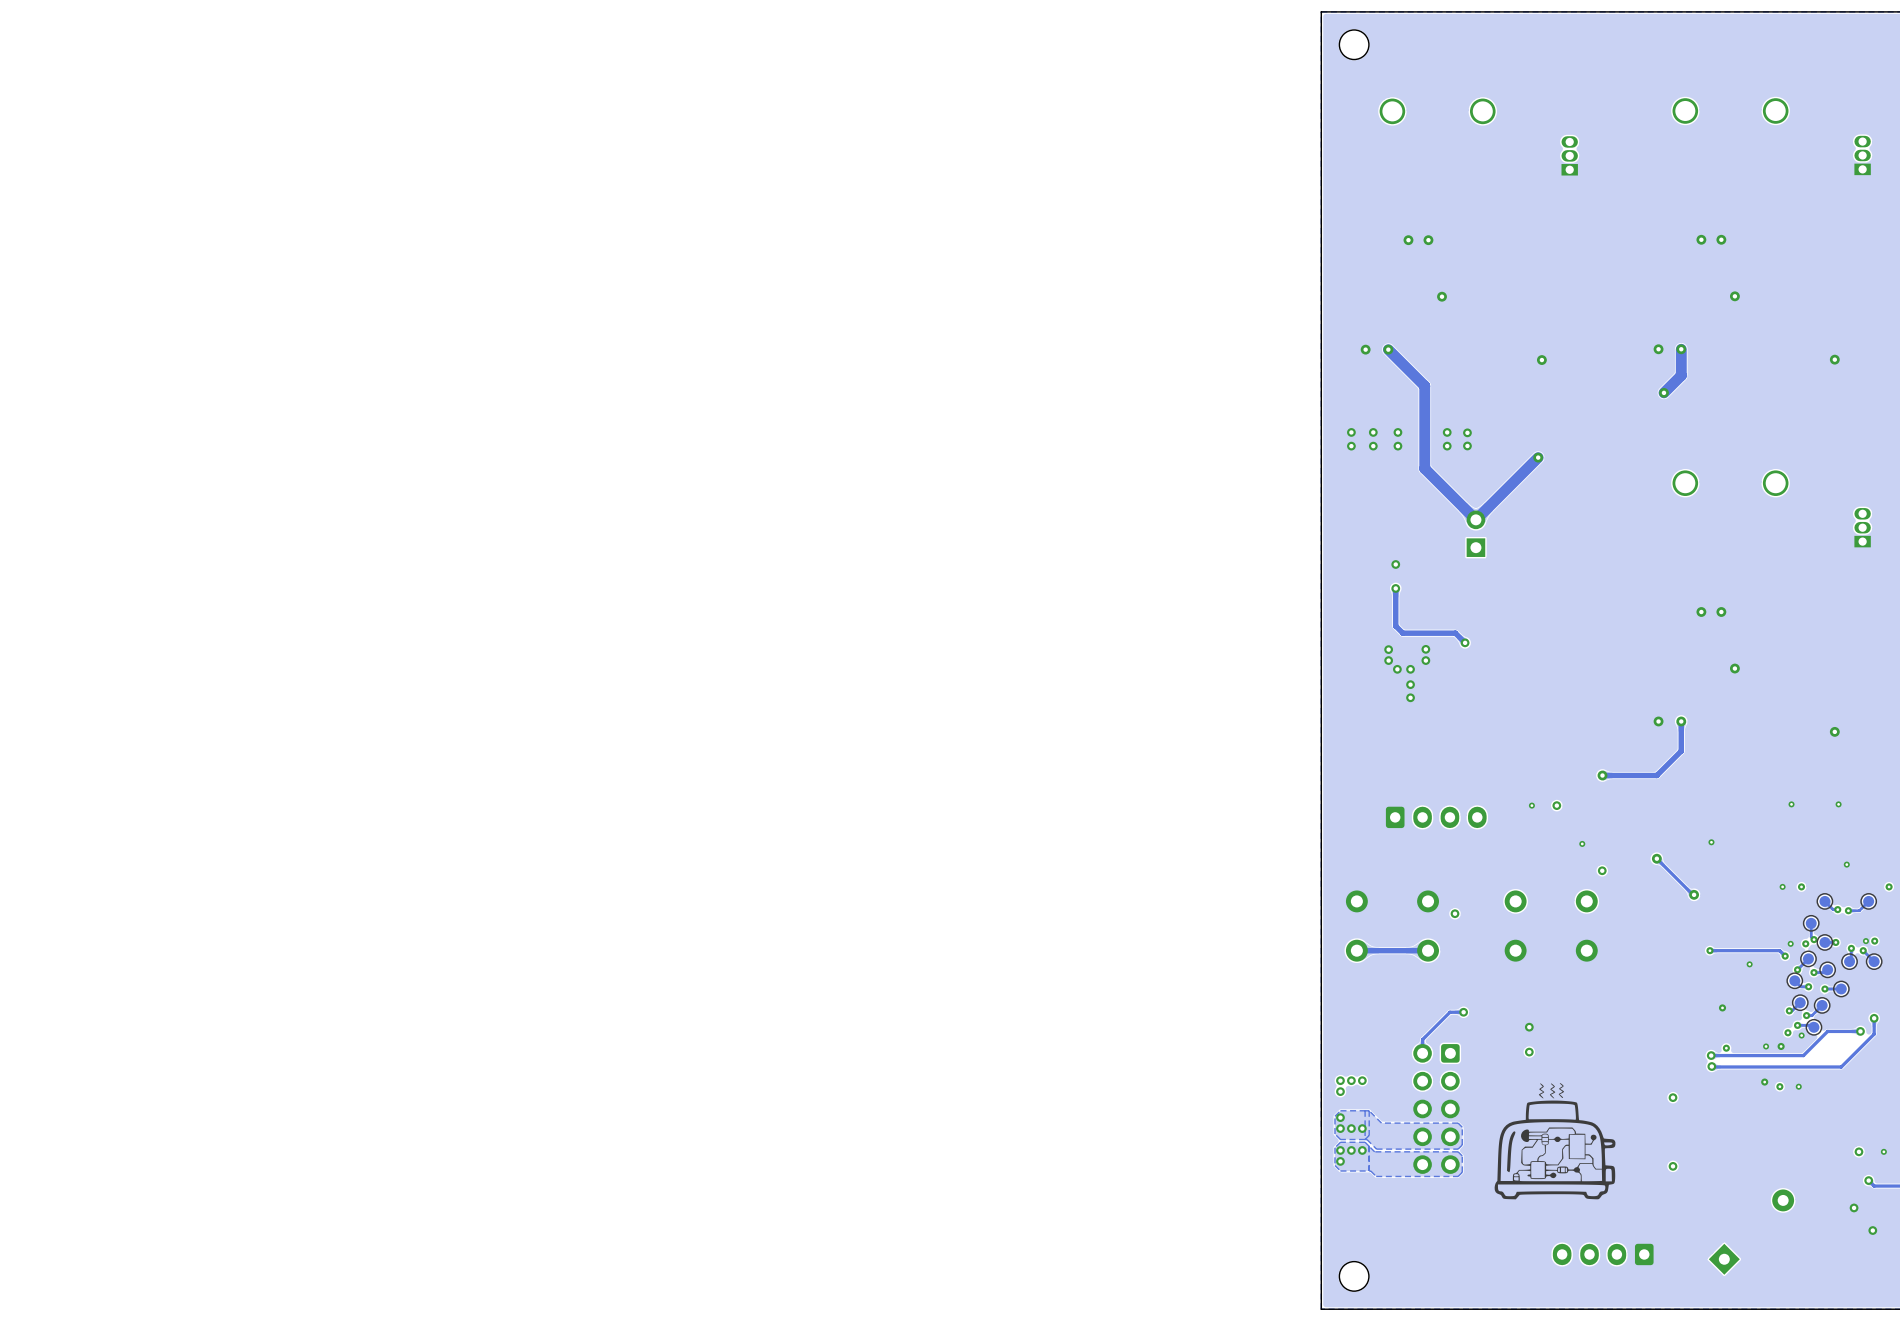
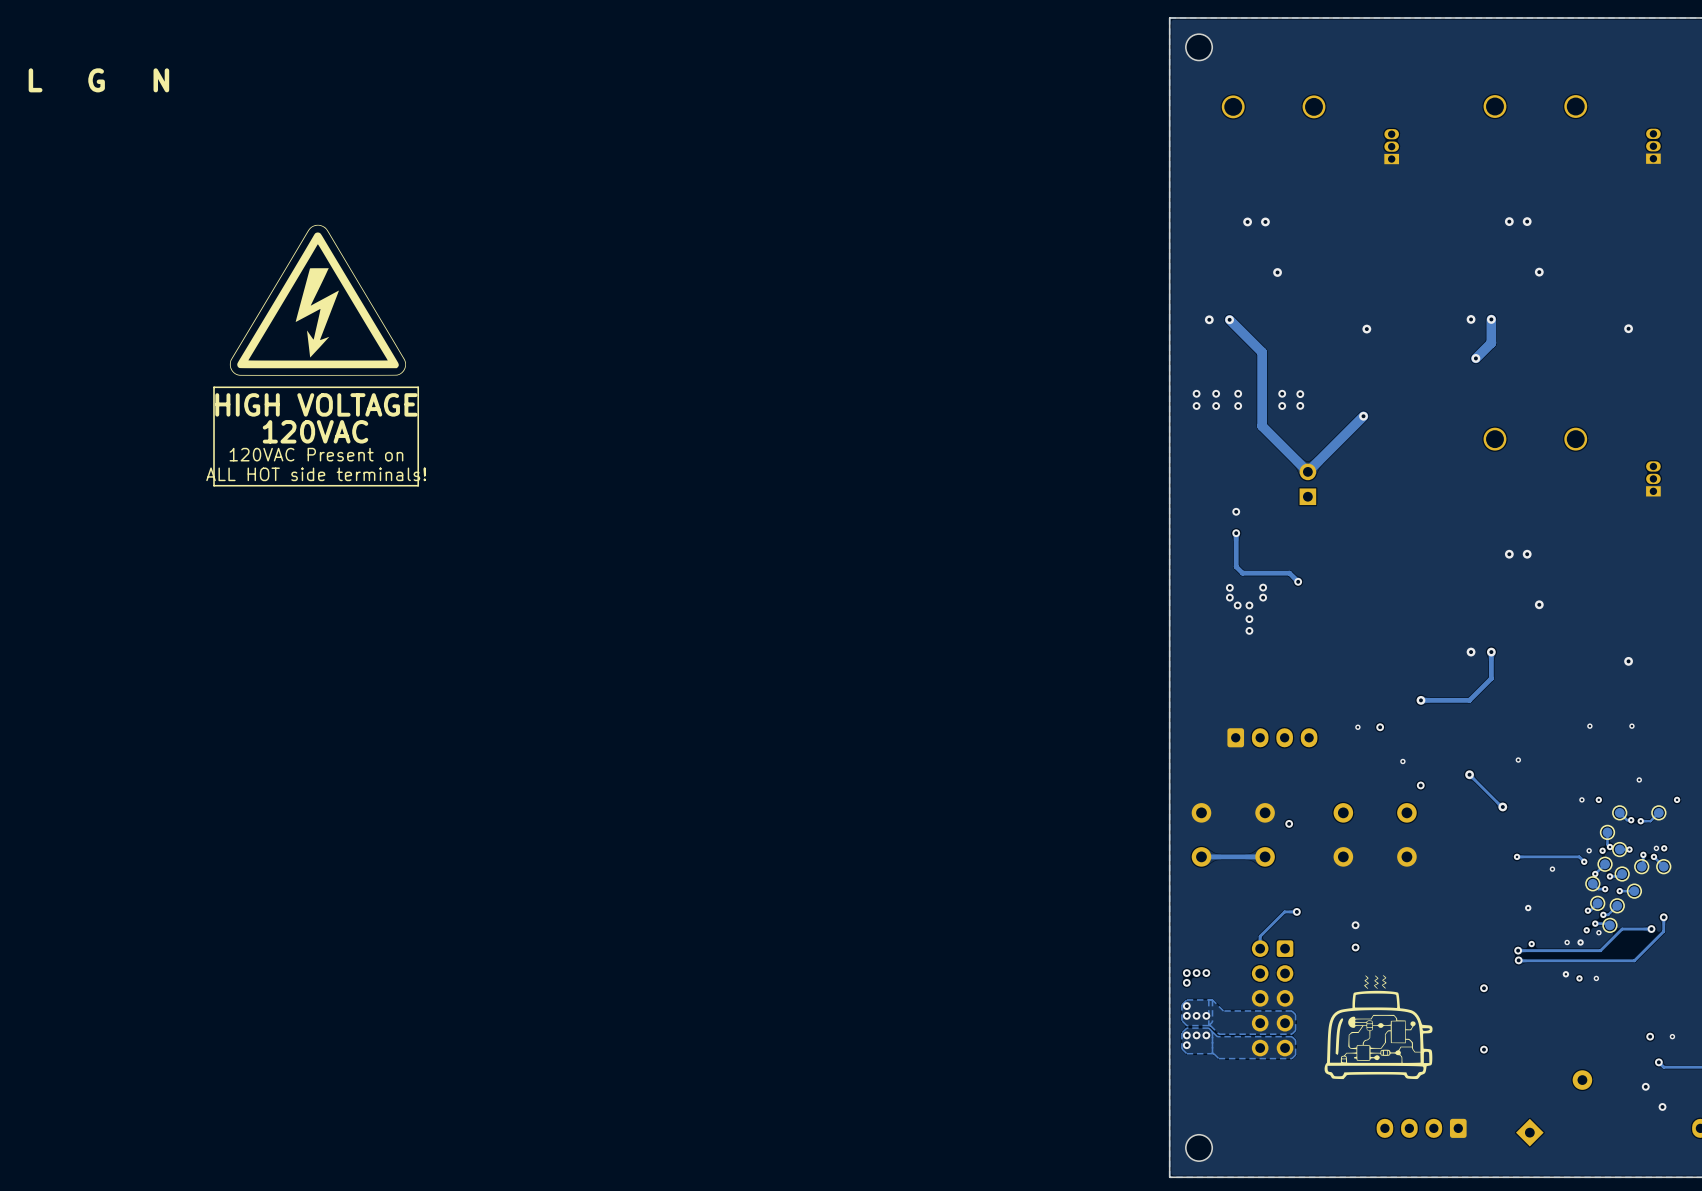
text: none -> L G N (98, 80)
drawing: none -> [229, 224, 406, 376]
line: none -> (418, 387) (214, 387) (214, 485) (418, 485) (418, 387)
text: none -> HIGH VOLTAGE (316, 404)
text: none -> 120VAC (315, 431)
text: none -> 120VAC Present on (316, 454)
text: none -> ALL HOT side terminals! (316, 474)

